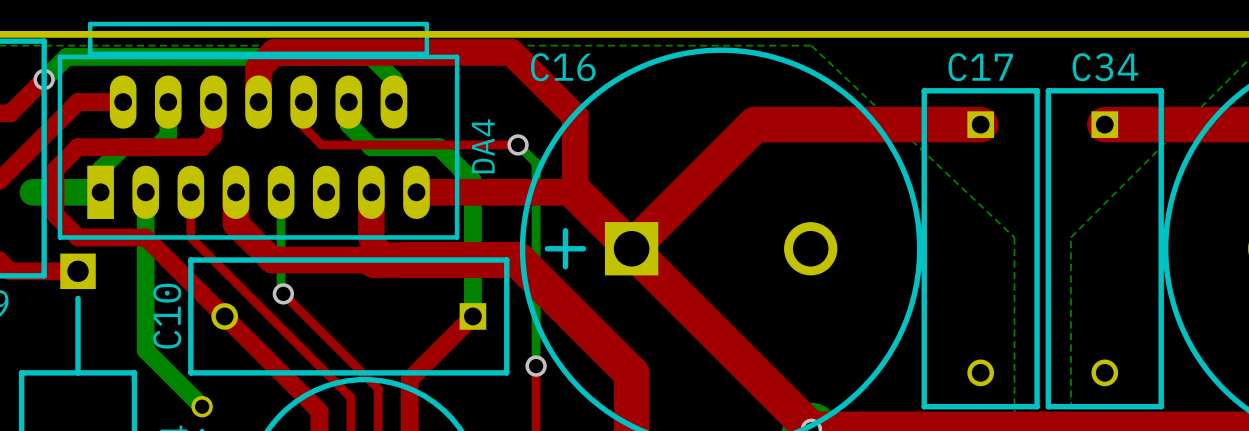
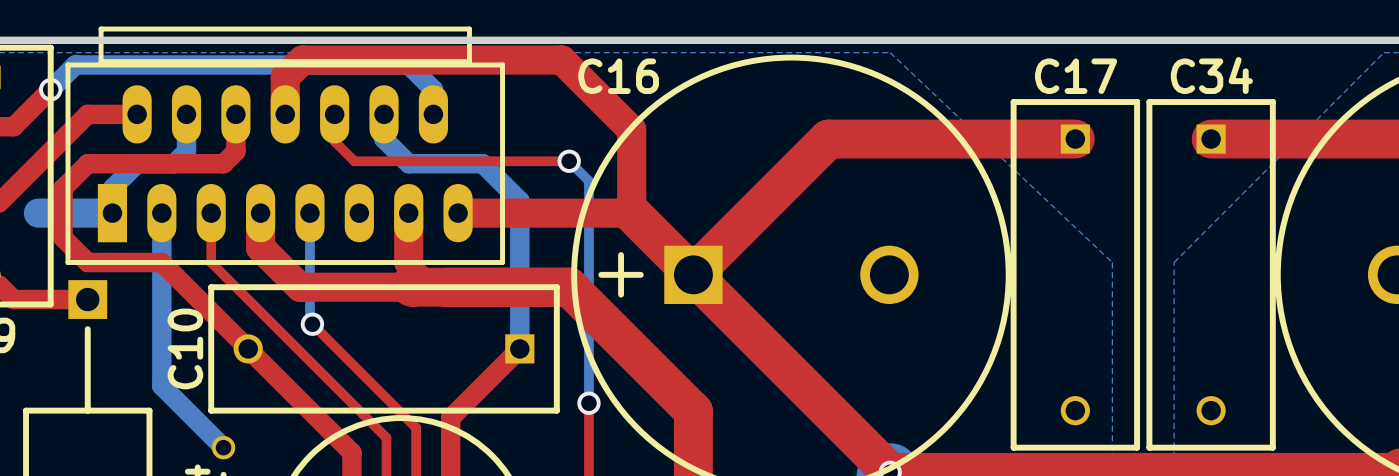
DA4 name: DA4 (483, 146) -> none

